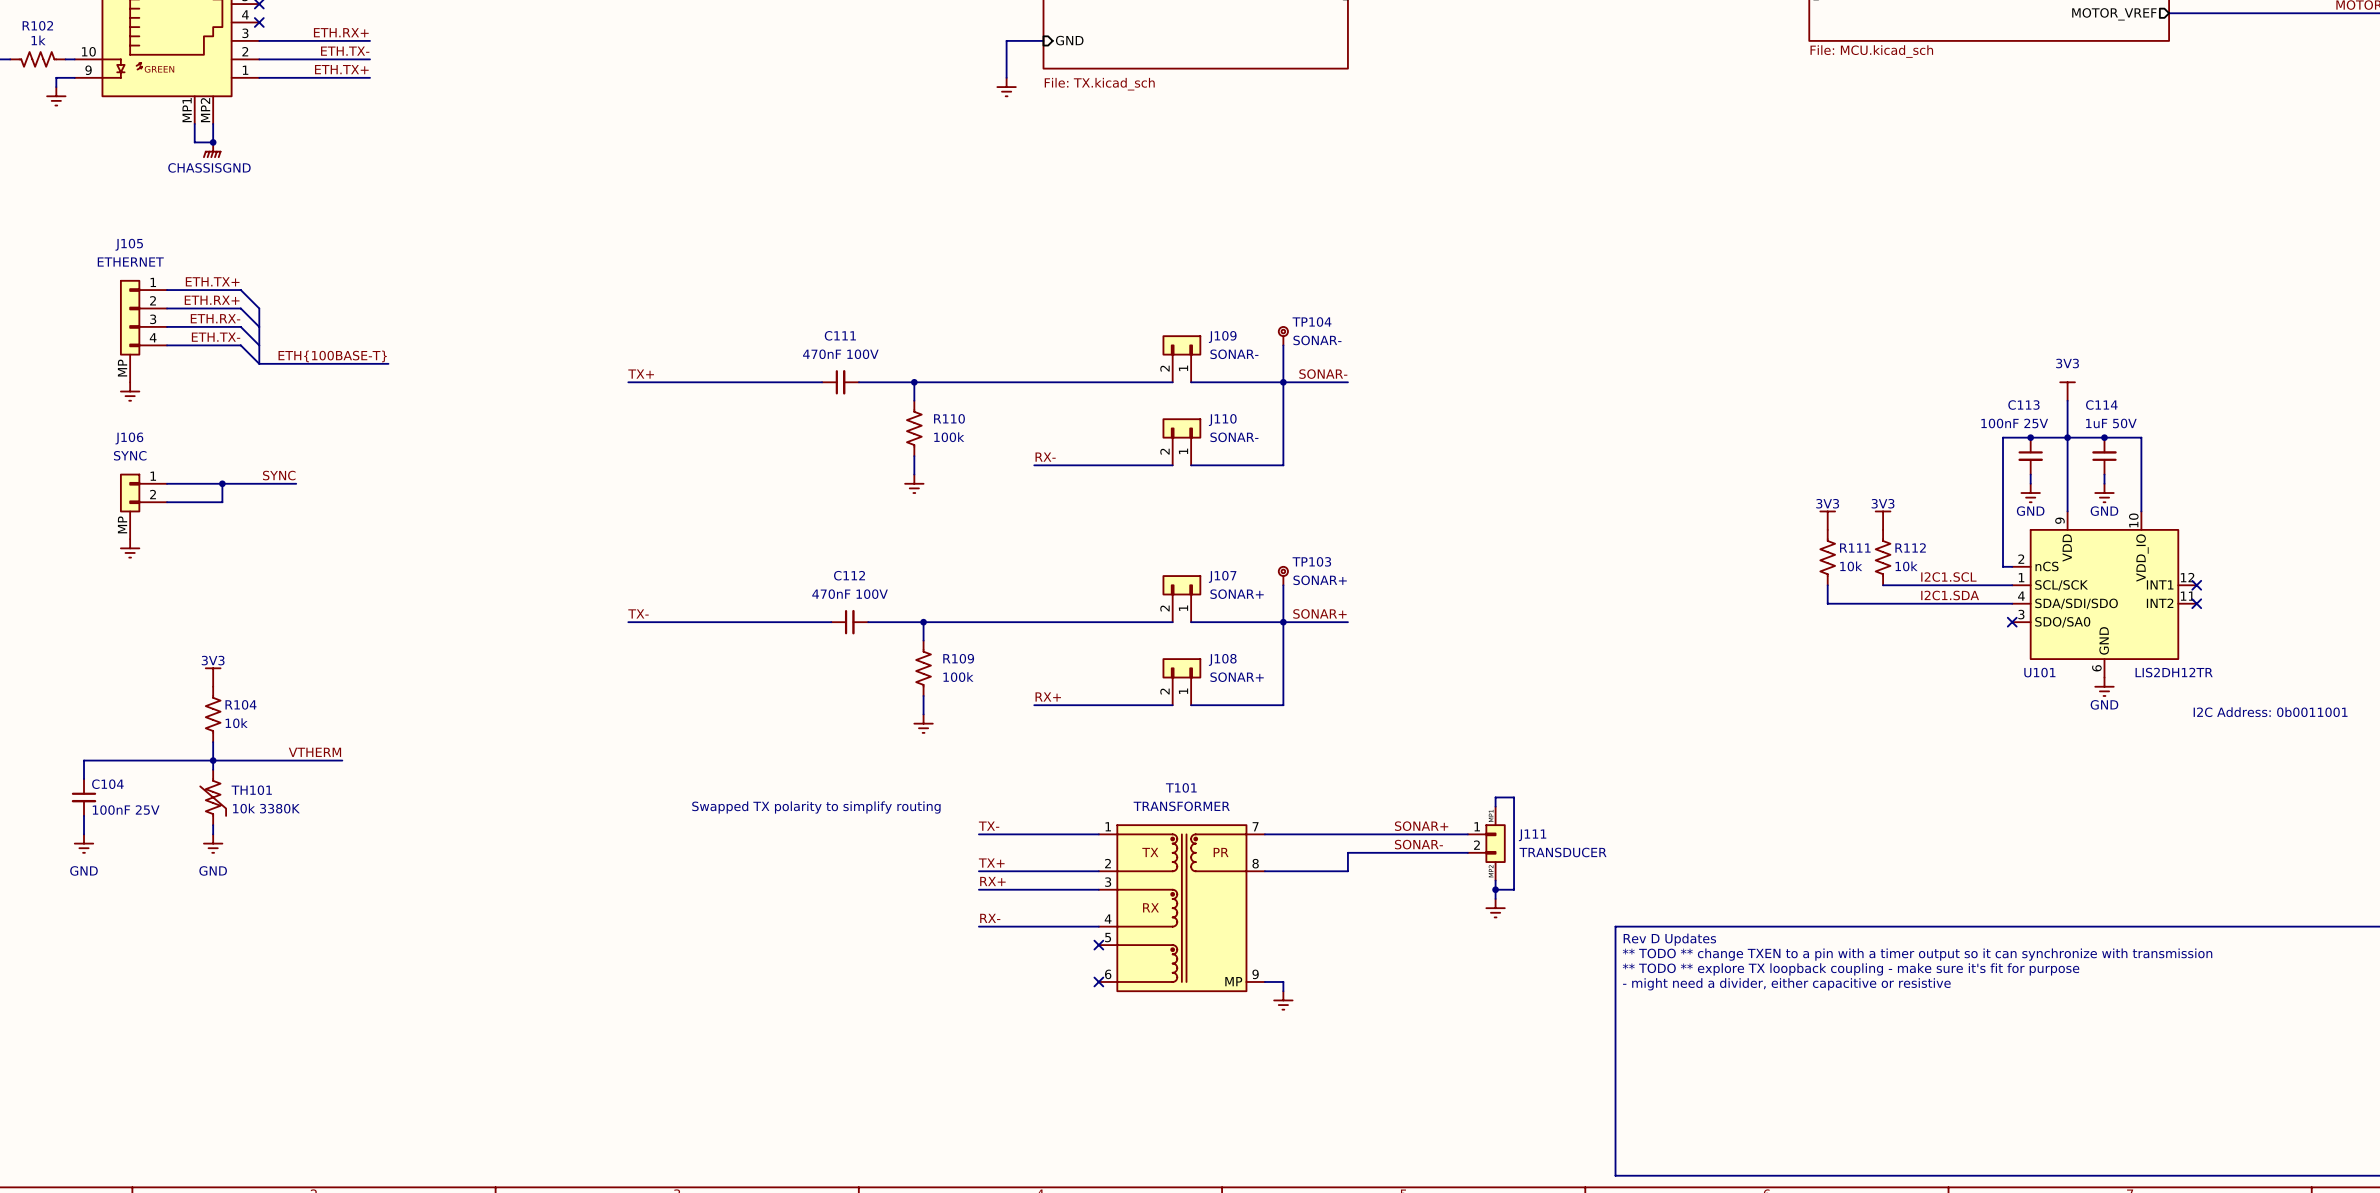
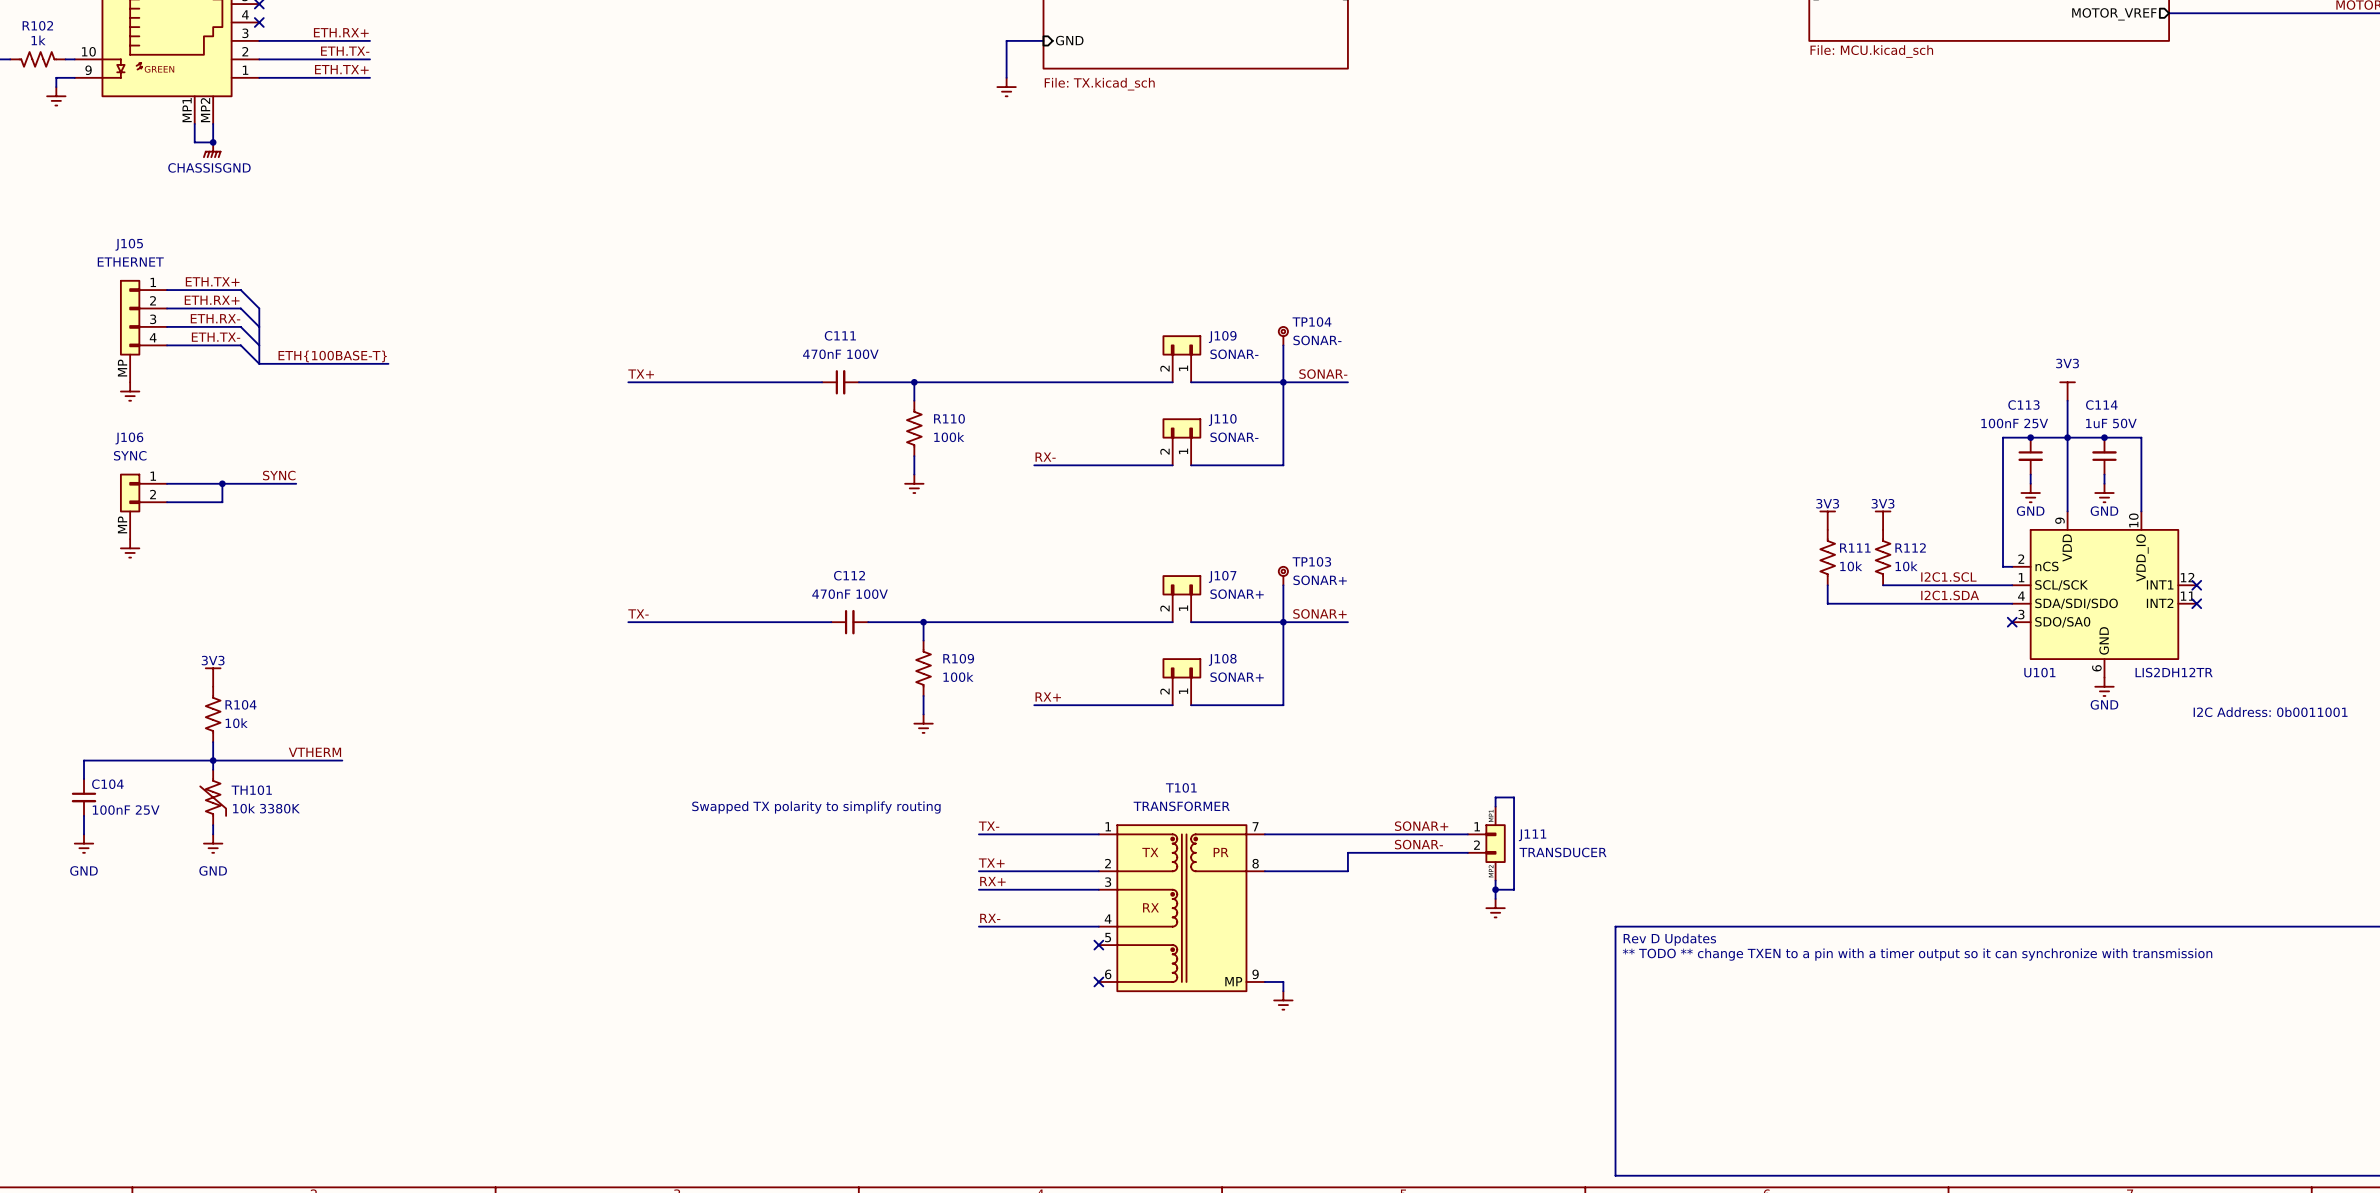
text: ** TODO ** explore TX loopback coupling - make sure it's fit for purpose (1851, 969) -> none
text: - might need a divider, either capacitive or resistive (1786, 984) -> none

